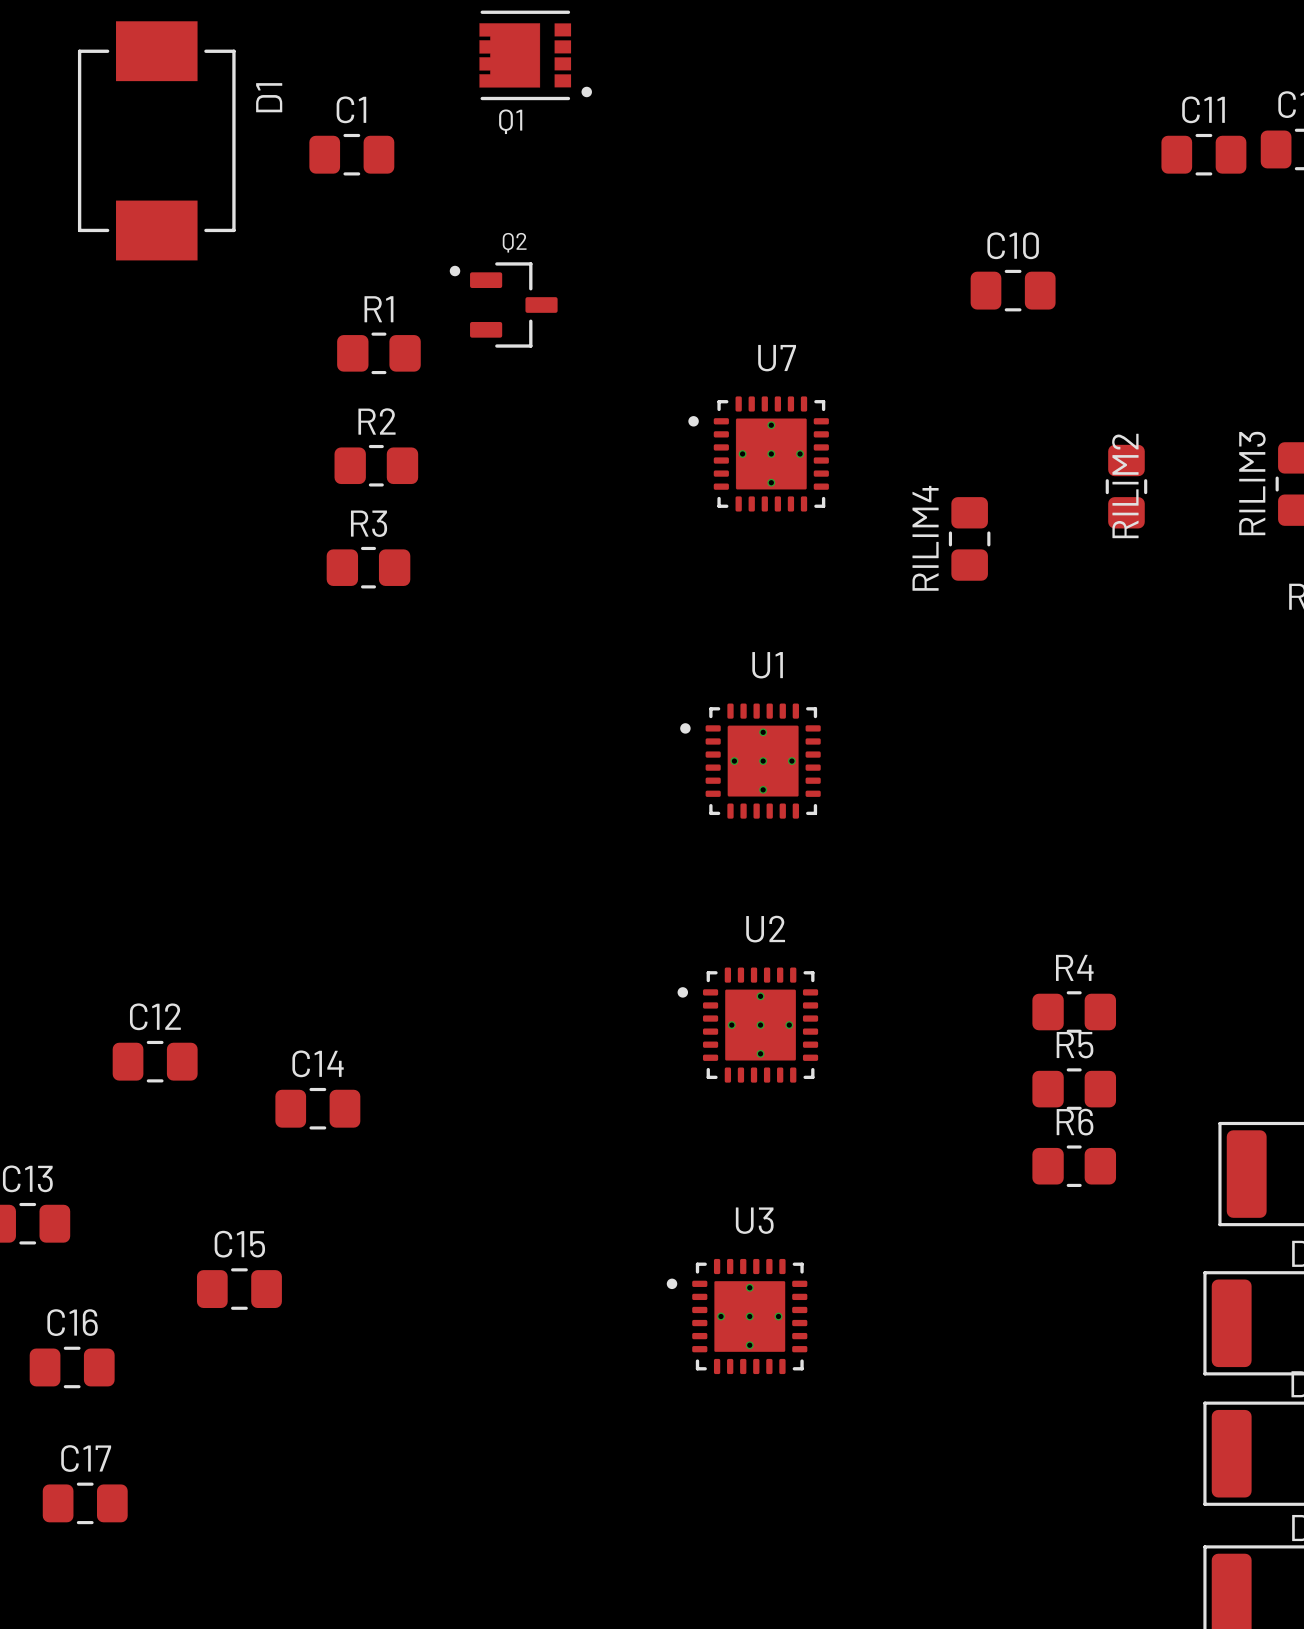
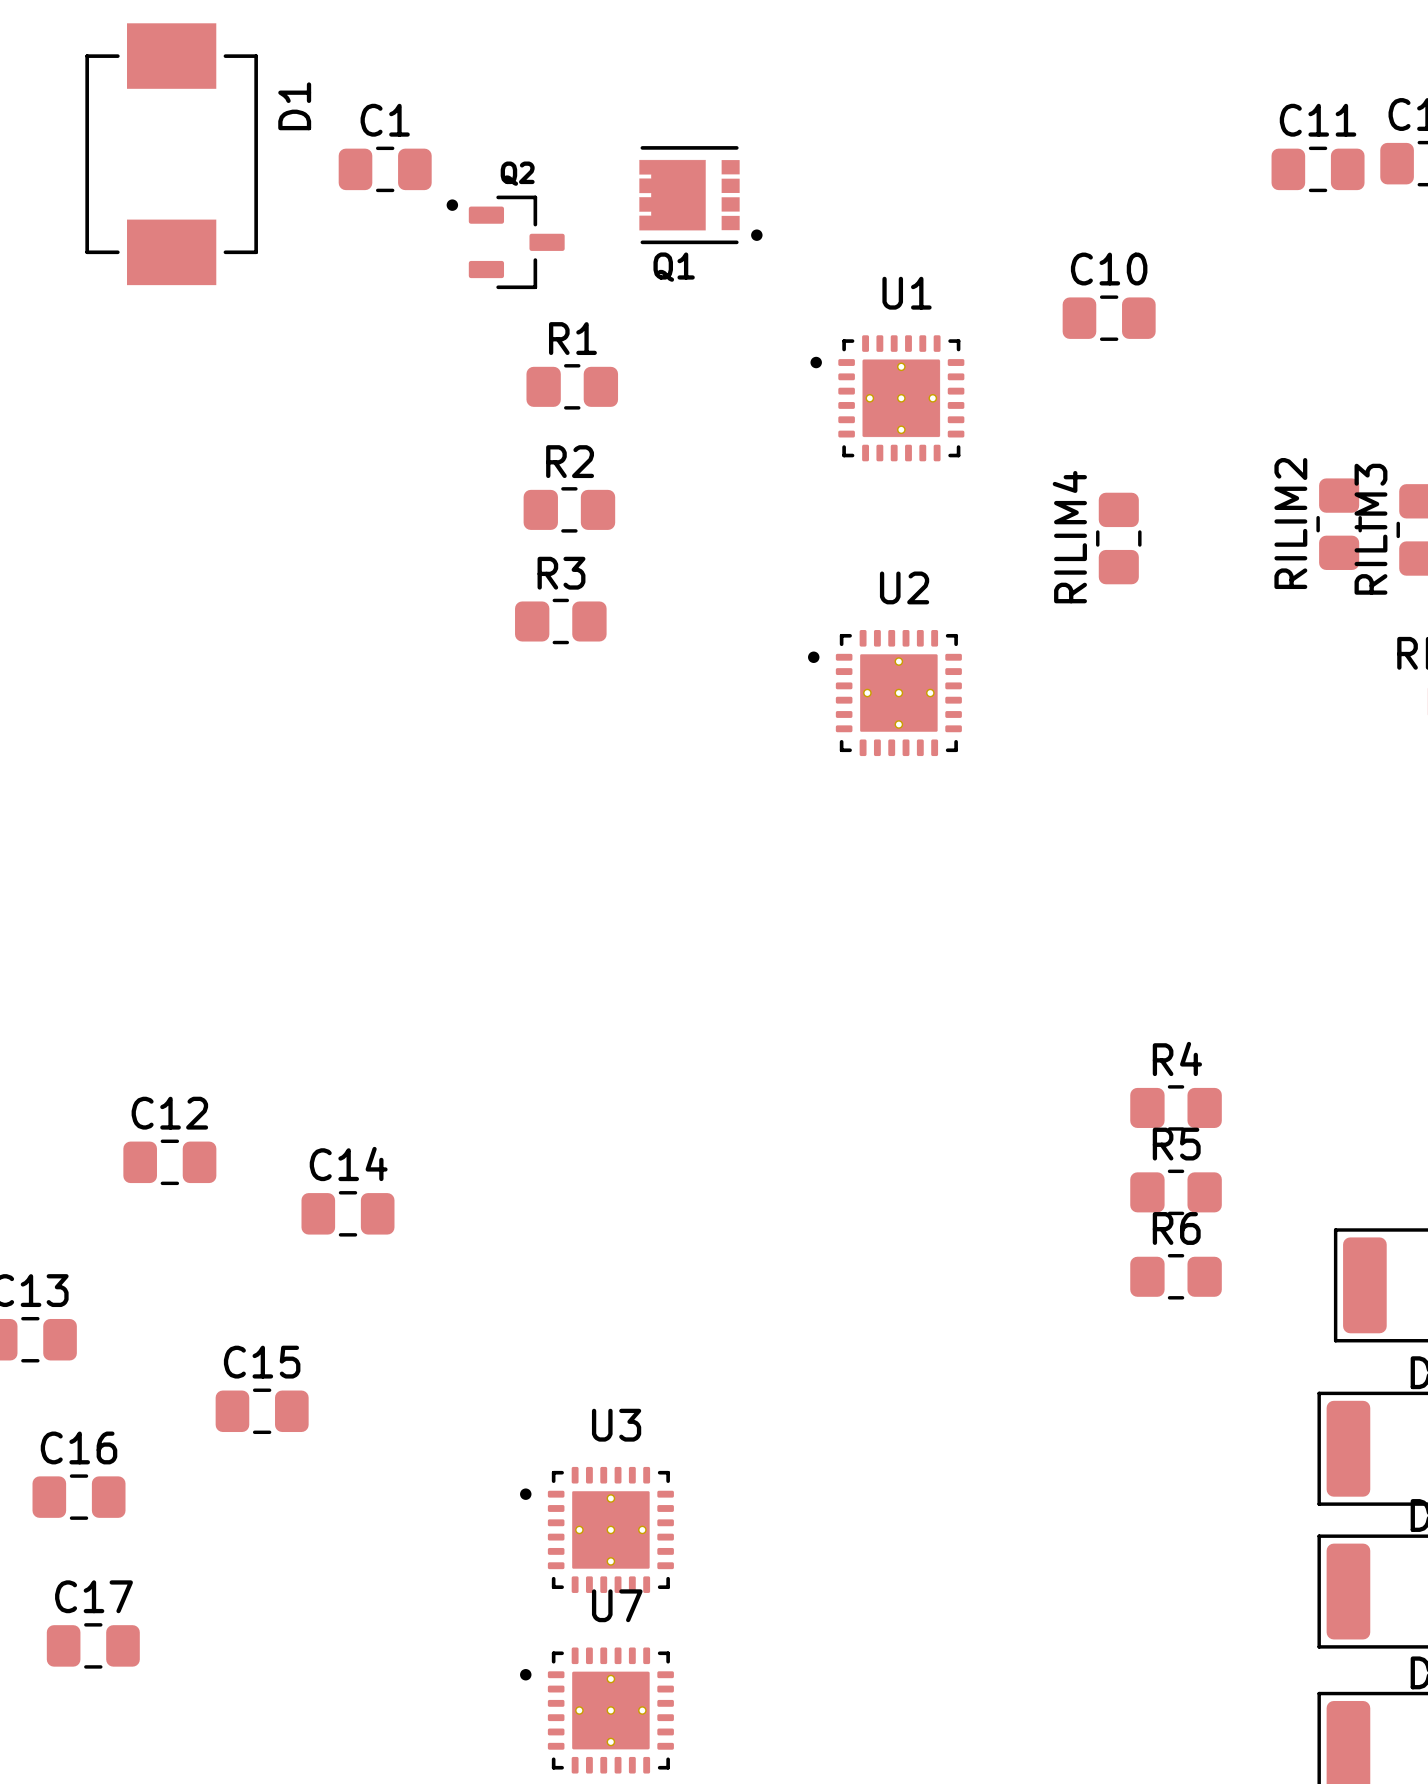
Q1 position: (535, 55) -> (700, 195)
Q2 position: (503, 304) -> (505, 242)
R1 position: (378, 353) -> (572, 386)
U7 position: (758, 453) -> (596, 1710)
R2 position: (376, 465) -> (569, 509)
RILIM2 name position: RILIM2 (1125, 485) -> RILIM2 (1290, 523)
RILIM2 position: (1126, 486) -> (1339, 524)
RILIM4 position: (969, 538) -> (1118, 538)
R3 position: (368, 567) -> (560, 621)
U1 position: (750, 761) -> (887, 398)
U2 position: (747, 1025) -> (884, 693)
U3 position: (737, 1316) -> (596, 1529)

